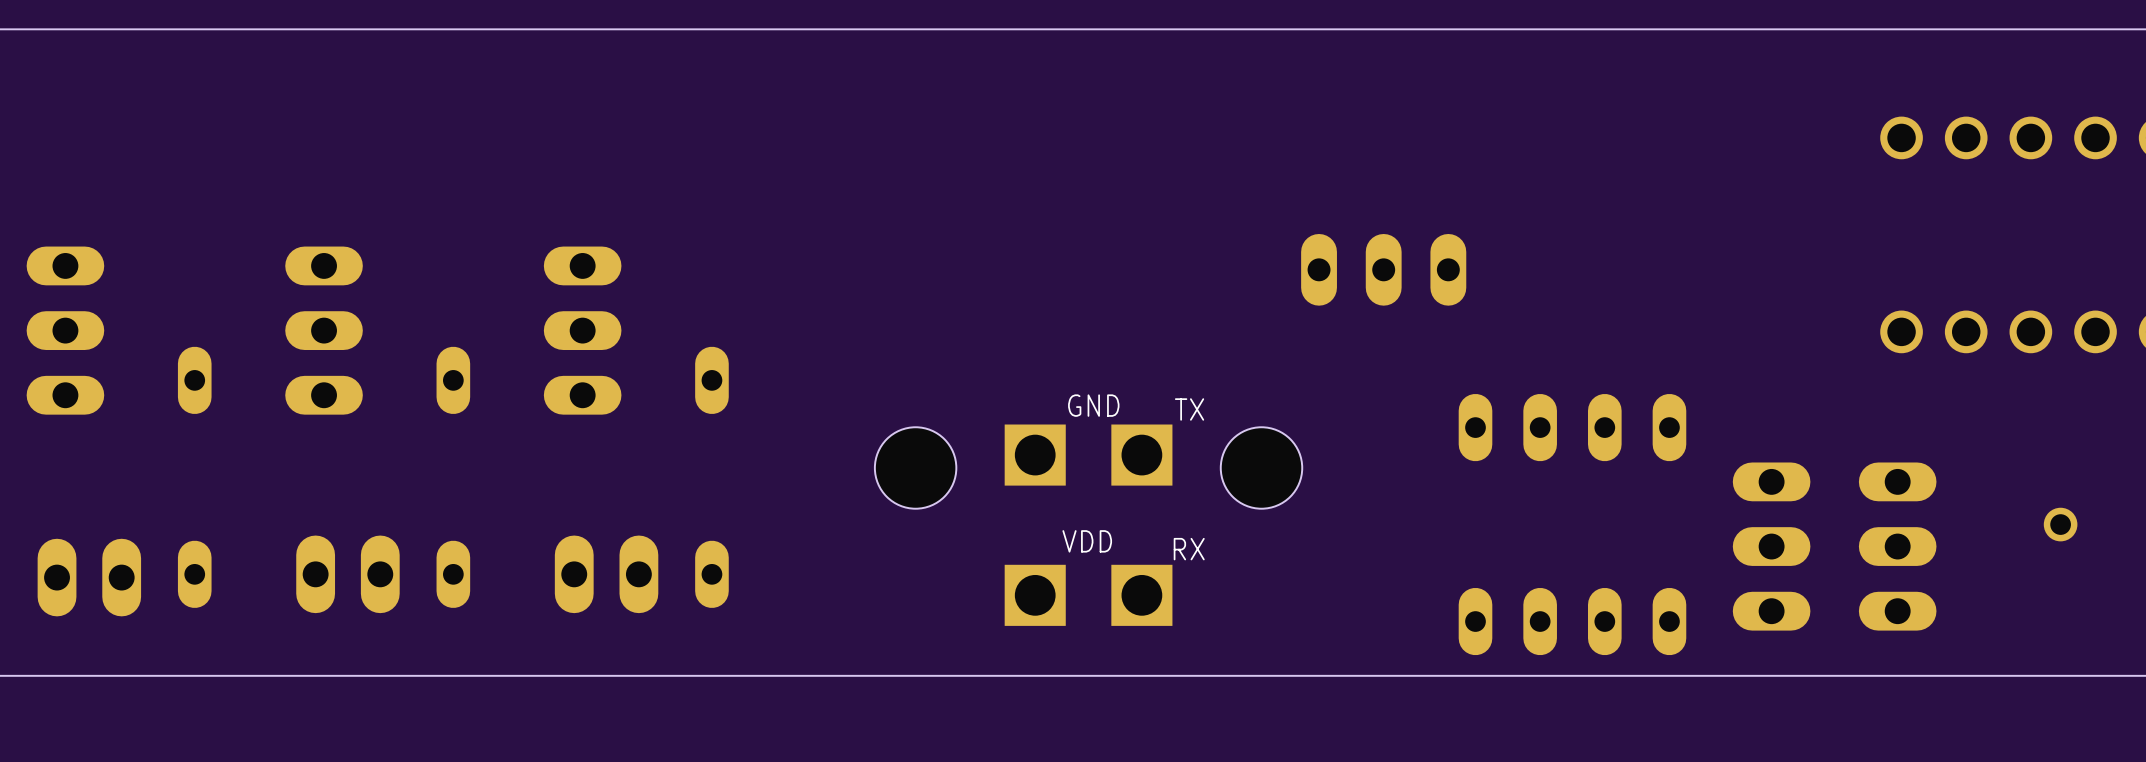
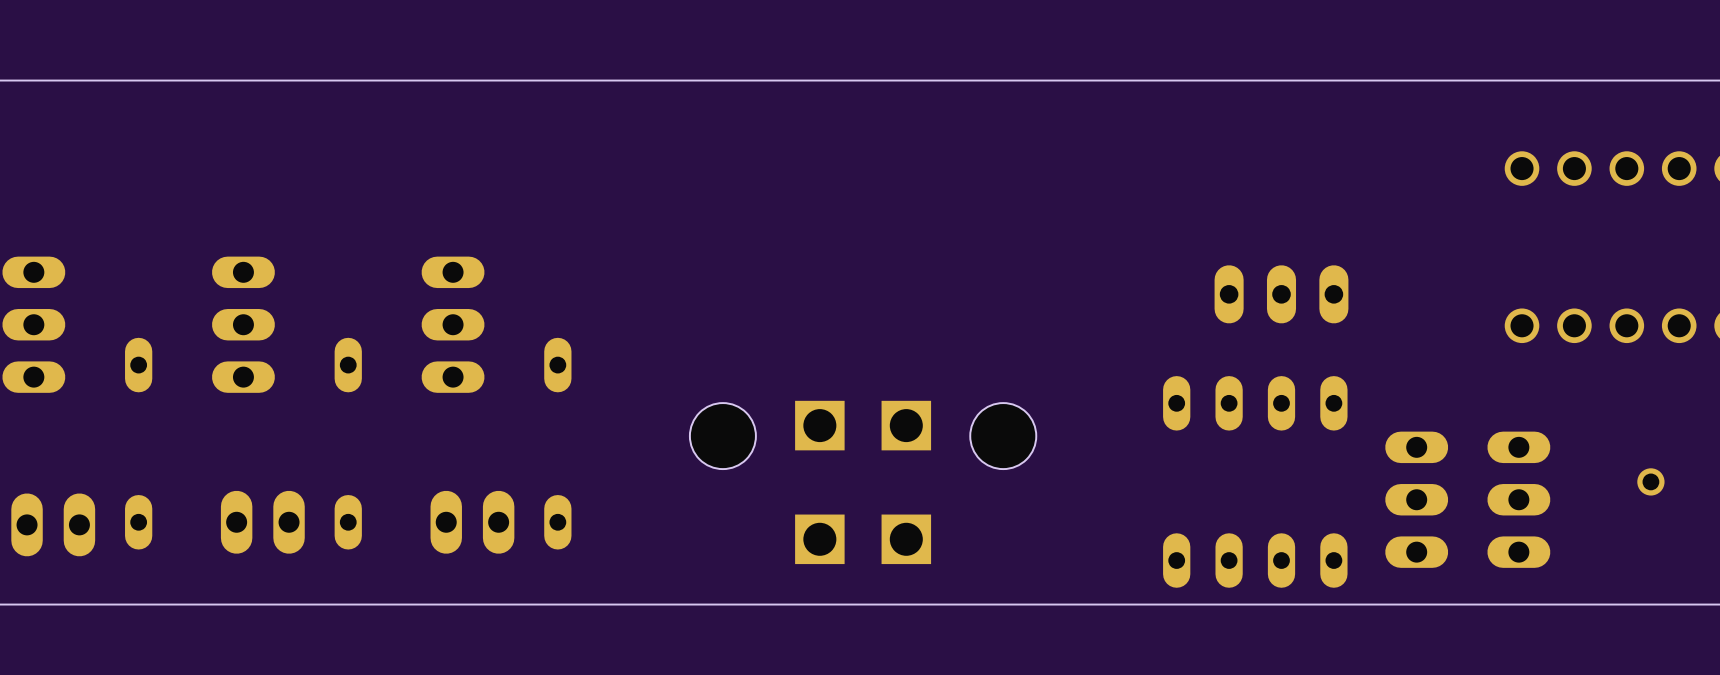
part position: (1383, 269) -> (1281, 294)
text: GND (1093, 405) -> none
text: TX (1189, 409) -> none
text: VDD (1087, 541) -> none
text: RX (1189, 549) -> none

